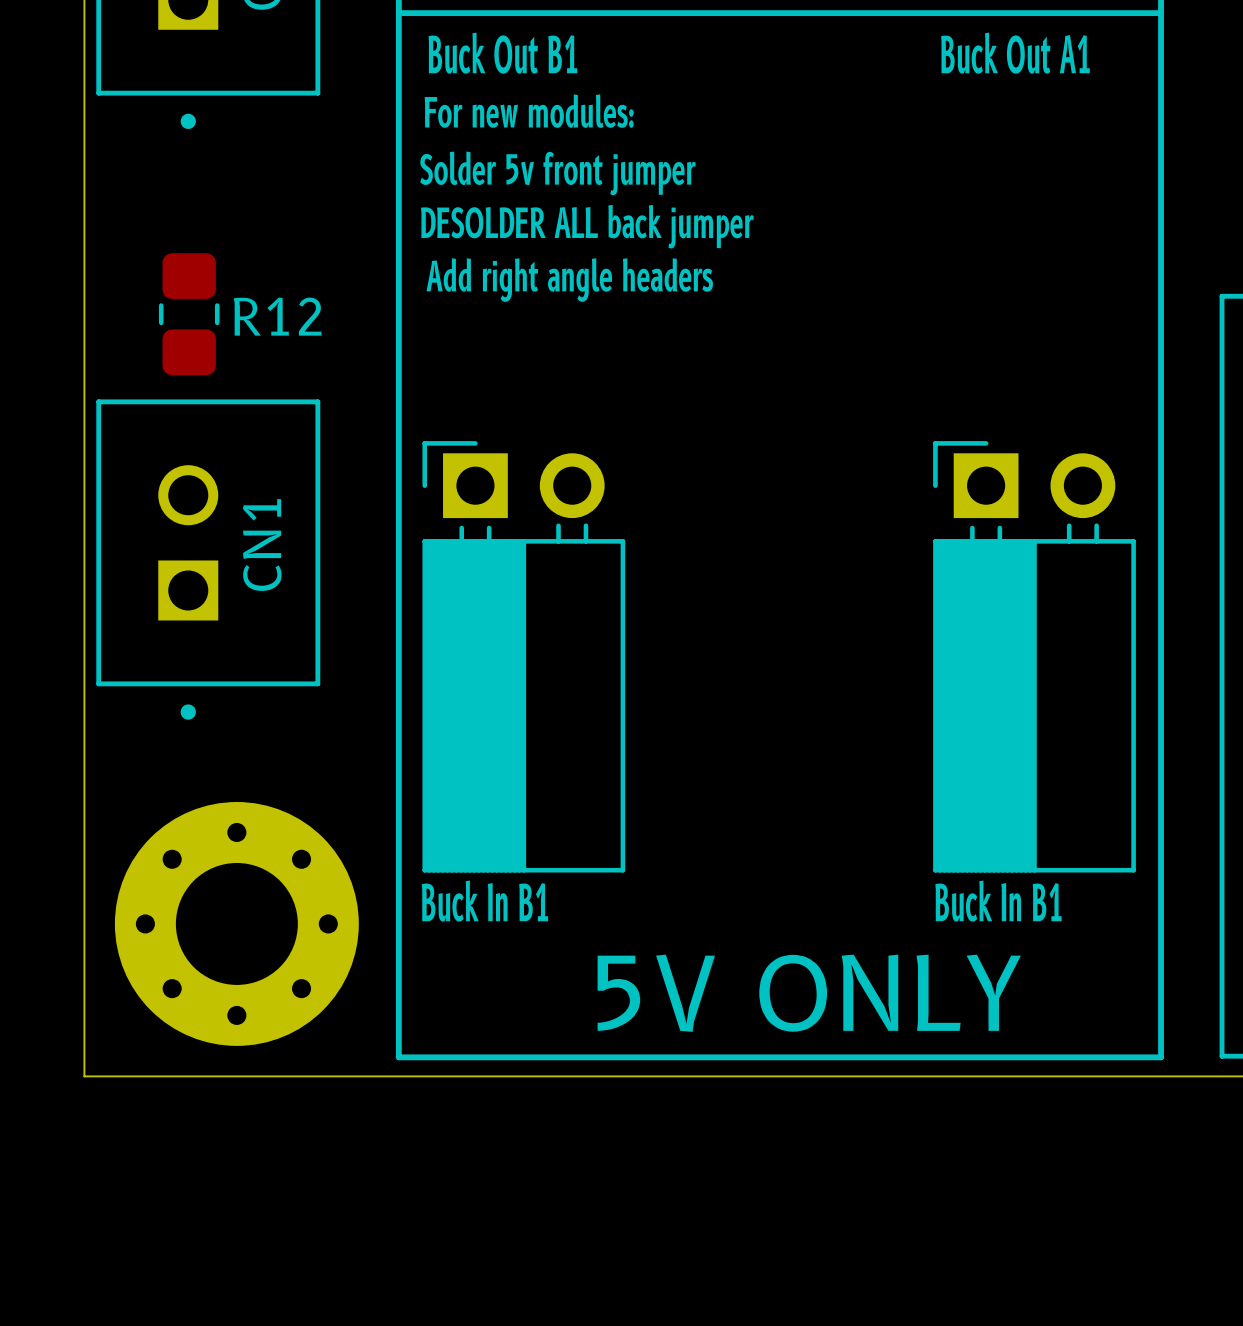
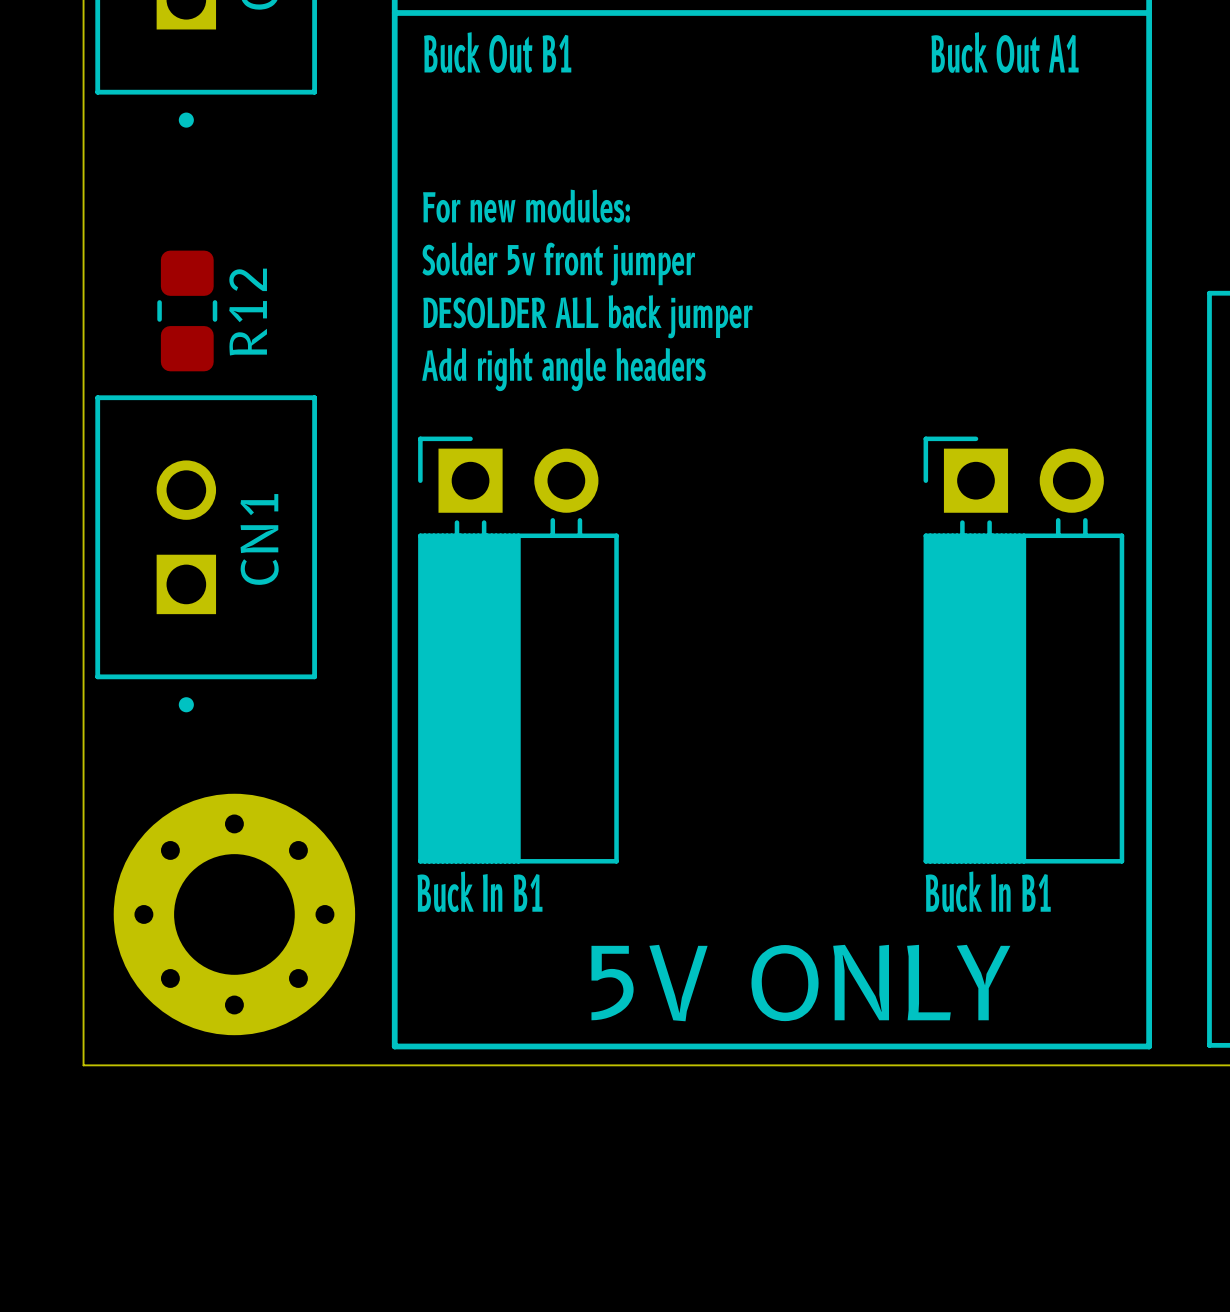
text: For new modules: (529, 111) -> none
text: Solder 5v front jumper (557, 173) -> none
text: DESOLDER ALL back jumper (587, 226) -> For new modules: (526, 206)
text: Add right angle headers (569, 280) -> Solder 5v front jumper (558, 263)
R12 name rotation: 0° (277, 316) -> 90° counterclockwise (248, 312)
text: none -> DESOLDER ALL back jumper (587, 316)
text: none -> Add right angle headers (563, 369)

